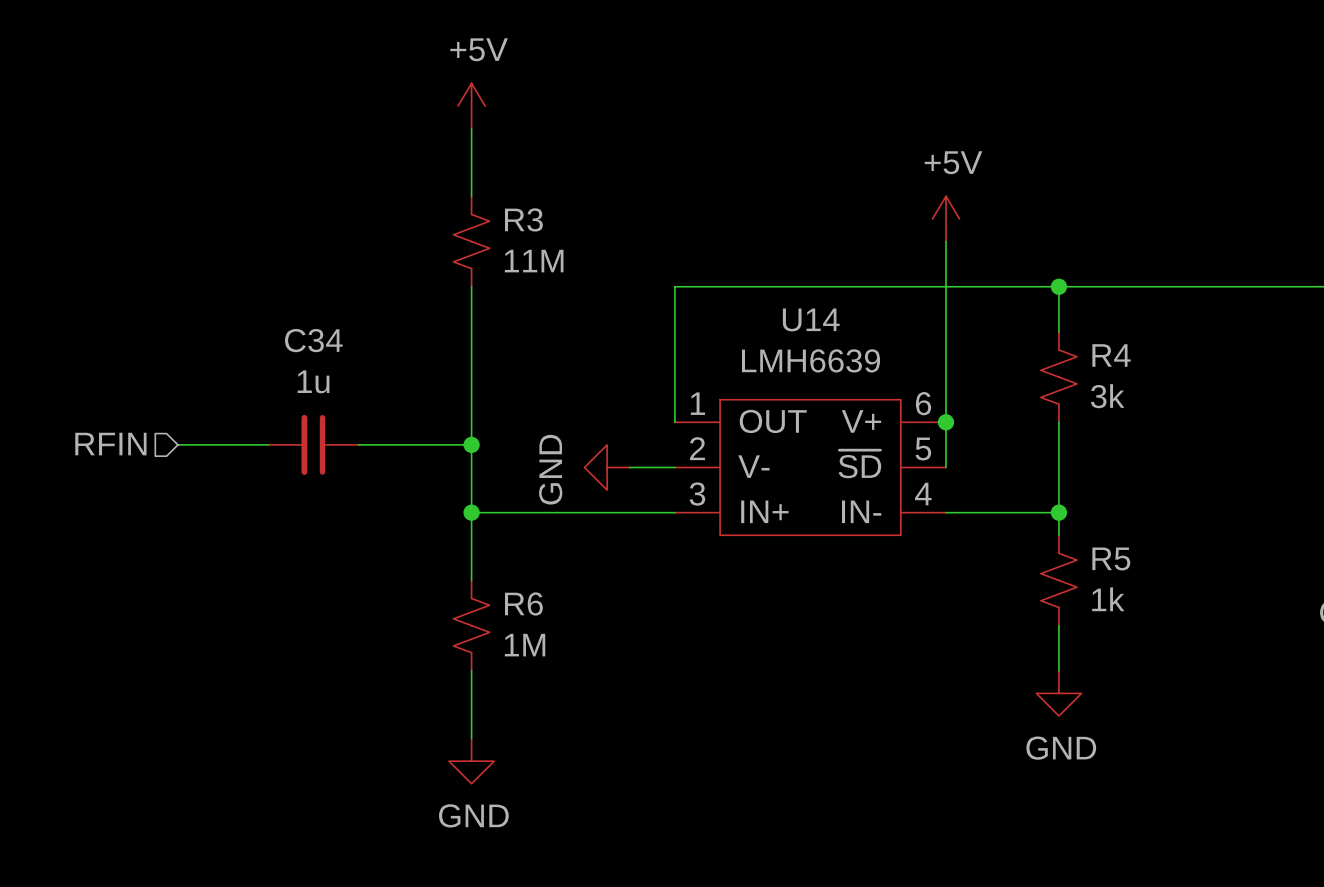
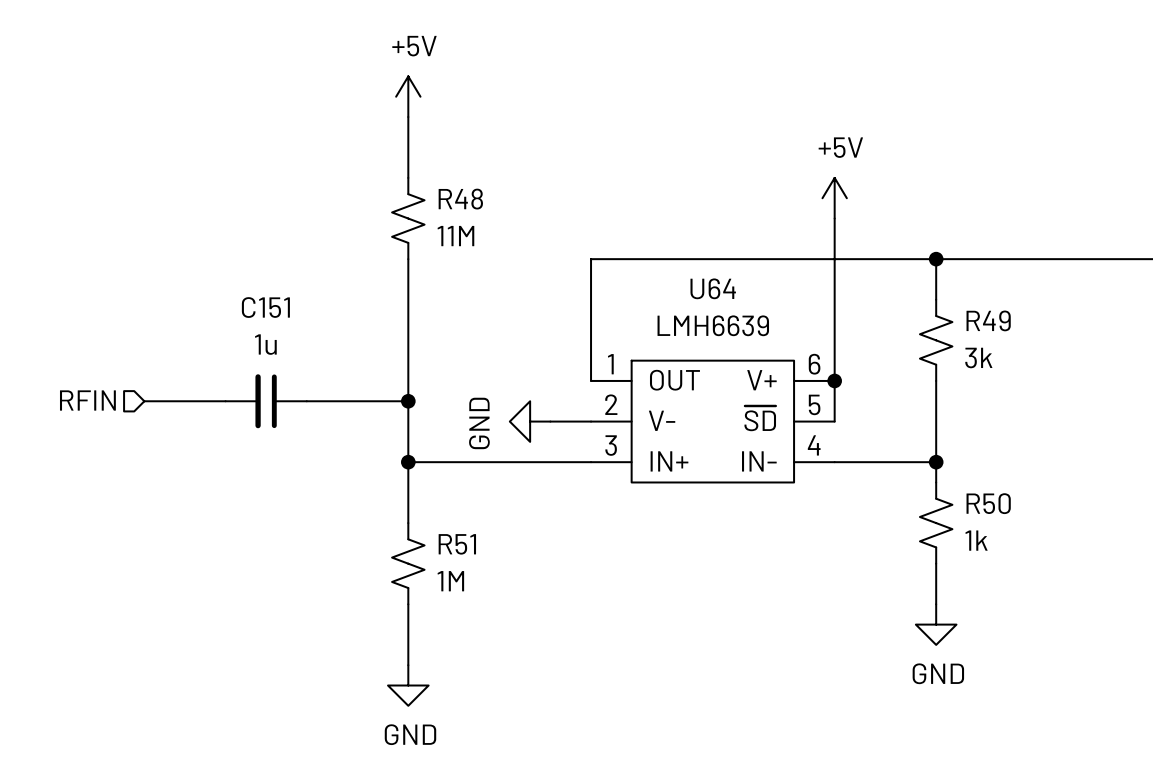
R3 name: R3 (523, 219) -> R48 (460, 199)
U14 name: U14 (811, 319) -> U64 (713, 288)
C34 name: C34 (313, 340) -> C151 (265, 307)
R4 name: R4 (1111, 355) -> R49 (988, 320)
R5 name: R5 (1111, 558) -> R50 (988, 503)
R6 name: R6 (523, 603) -> R51 (457, 544)

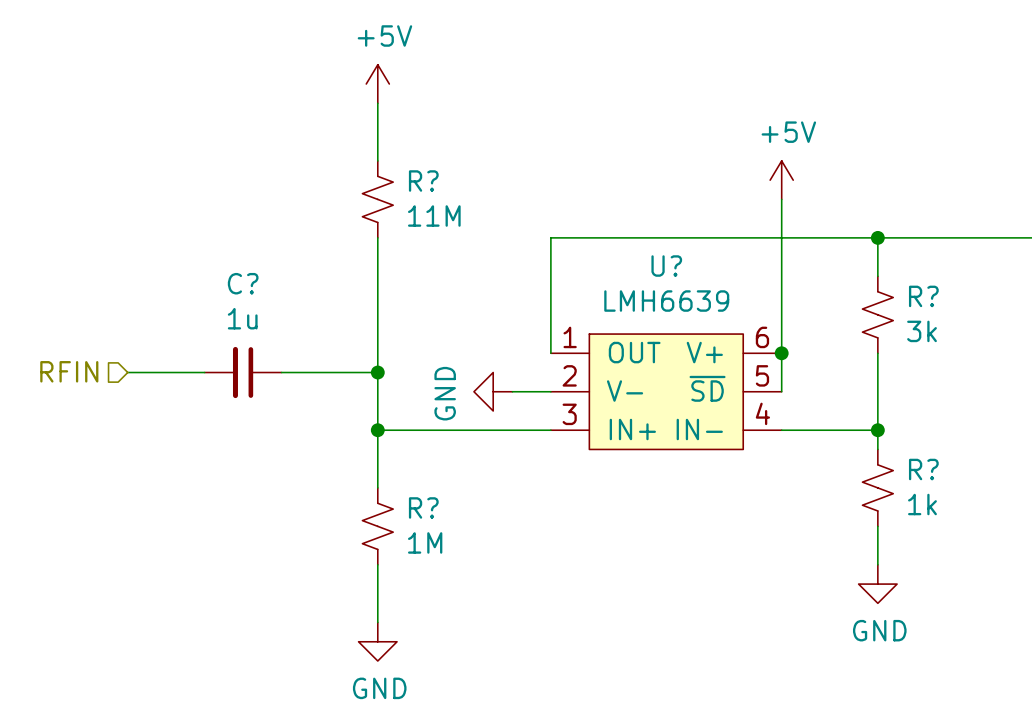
R48 name: R48 (460, 199) -> R? (423, 181)
U64 name: U64 (713, 288) -> U? (666, 266)
C151 name: C151 (265, 307) -> C? (243, 283)
R49 name: R49 (988, 320) -> R? (923, 296)
R50 name: R50 (988, 503) -> R? (923, 469)
R51 name: R51 (457, 544) -> R? (423, 507)

